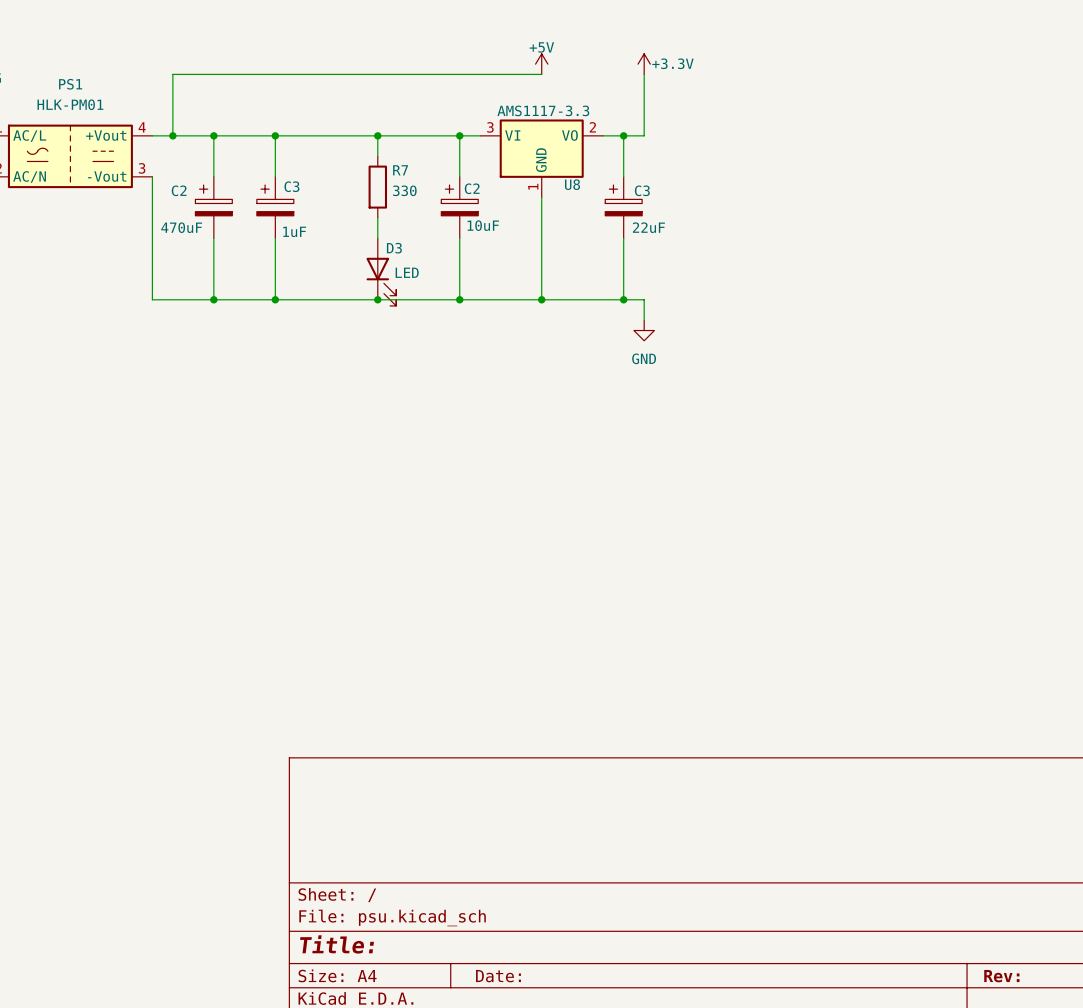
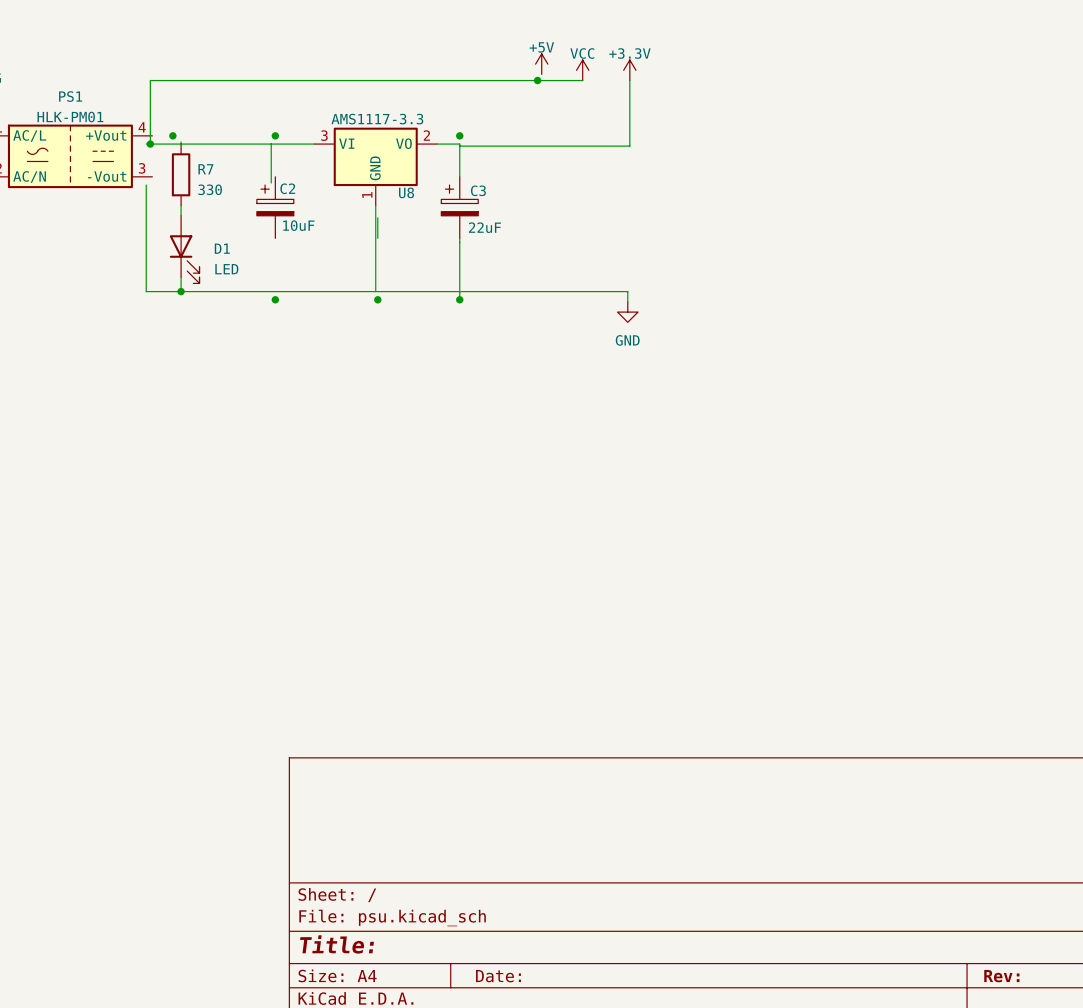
power symbol text position: +3.3V (672, 63) -> +3.3V (629, 53)
power symbol position: +3.3V (644, 64) -> +3.3V (629, 70)
power symbol: none -> VCC (582, 70)
wire: (541, 74) (172, 74) (172, 135) -> none
wire: (644, 74) (644, 135) (603, 135) -> none
junction: none -> (537, 80)
wire: none -> (582, 80) (150, 80) (150, 144)
wire: none -> (629, 80) (629, 146) (459, 146)
PS1 name position: PS1 (70, 84) -> PS1 (70, 96)
PS1 value position: HLK-PM01 (70, 104) -> HLK-PM01 (70, 117)
wire: (152, 135) (480, 135) -> none
wire: (213, 135) (213, 176) -> none
junction: (213, 135) -> none
wire: (275, 135) (275, 176) -> none
junction: (377, 135) -> none
wire: (459, 135) (459, 144) -> (437, 144) (459, 144)
wire: (623, 135) (623, 176) -> none
junction: (623, 135) -> none
wire: none -> (181, 142) (181, 144)
wire: none -> (146, 144) (314, 144)
junction: none -> (150, 144)
wire: none -> (271, 144) (271, 182)
U8 position: (541, 158) -> (375, 166)
R7 name position: R7 (400, 170) -> R7 (205, 169)
wire: (152, 176) (152, 299) (644, 299) (644, 320) -> none
wire: none -> (146, 185) (146, 291) (627, 291) (627, 301)
C3 name: C3 (291, 186) -> C2 (287, 188)
R7 position: (377, 187) -> (181, 174)
C2 name: C2 (472, 188) -> C3 (478, 190)
R7 value position: 330 (404, 190) -> 330 (210, 189)
wire: (541, 197) (541, 299) -> none
wire: none -> (181, 205) (181, 215)
wire: none -> (375, 205) (375, 291)
C2: 470uF (213, 207) -> none
C3: 22uF (623, 207) -> none
C2 value: 10uF (483, 225) -> 22uF (484, 227)
C3 value: 1uF (294, 231) -> 10uF (298, 225)
wire: (213, 238) (213, 299) -> none
wire: (275, 238) (275, 299) -> none
wire: (623, 238) (623, 299) -> none
D1: none -> LED (184, 249)
D3: LED (381, 272) -> none
wire: none -> (181, 277) (181, 291)
junction position: (213, 299) -> (181, 291)
junction: (541, 299) -> none
junction: (623, 299) -> none
power symbol position: GND (644, 330) -> GND (627, 312)

